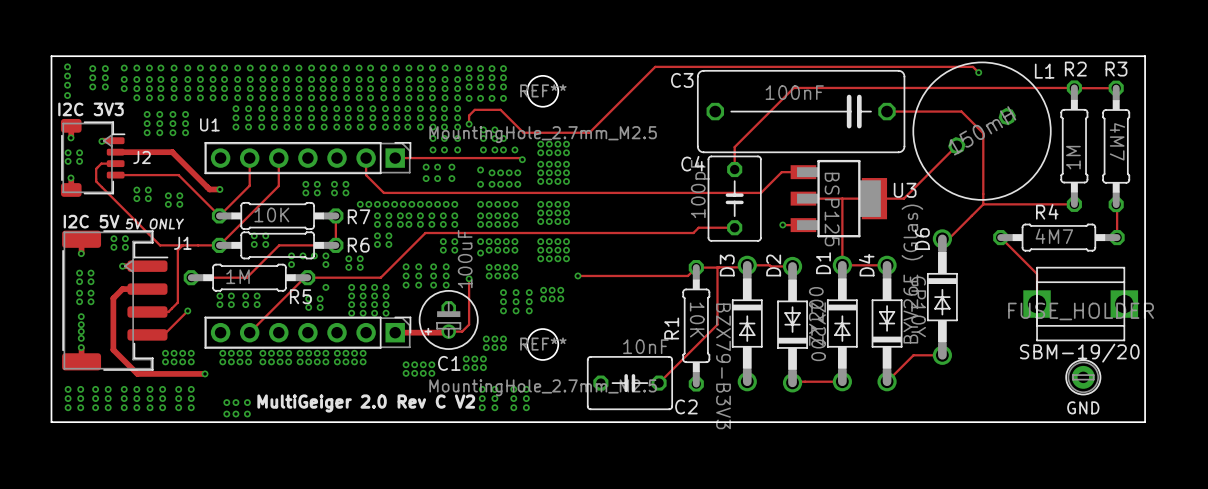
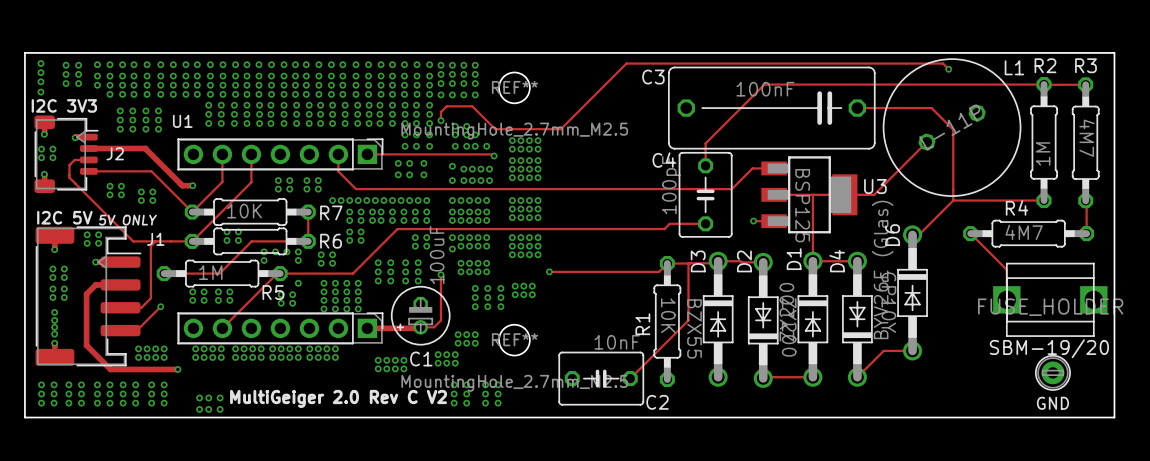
L1 value: 150mH (982, 130) -> L-11P (949, 127)
D3 value: BZX79-B3V3 (723, 366) -> BZX55 (694, 328)

